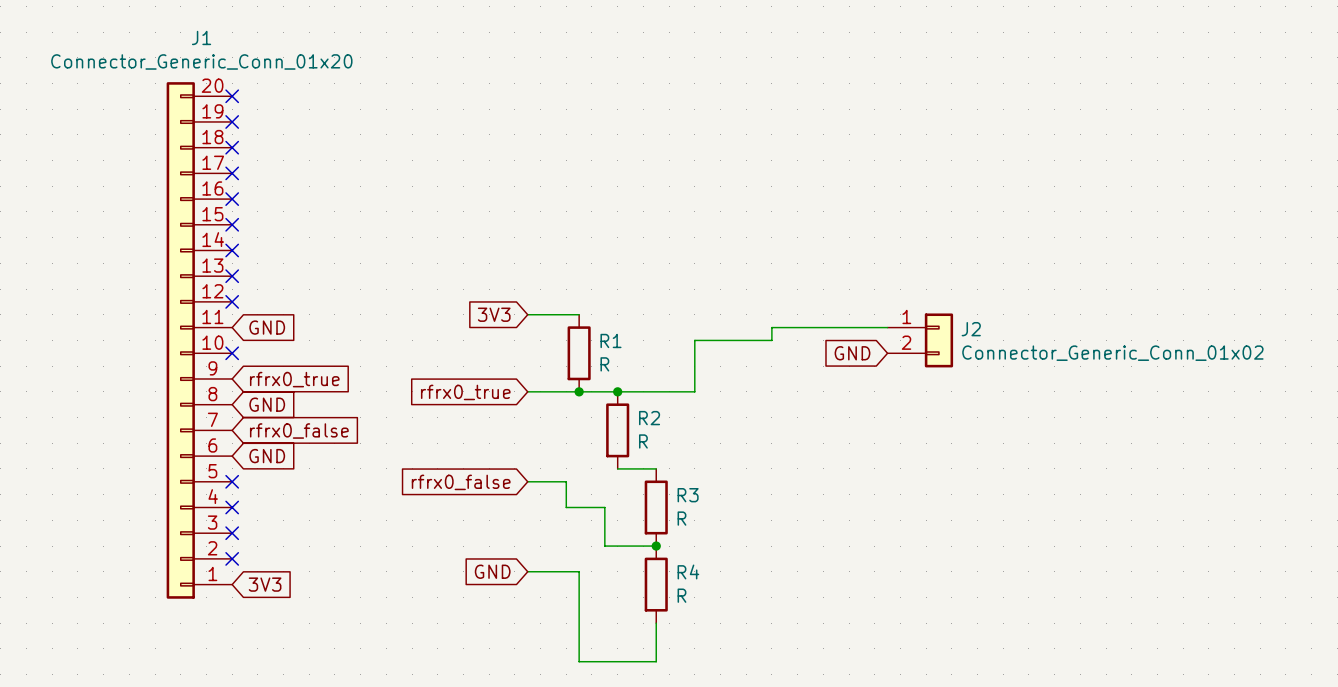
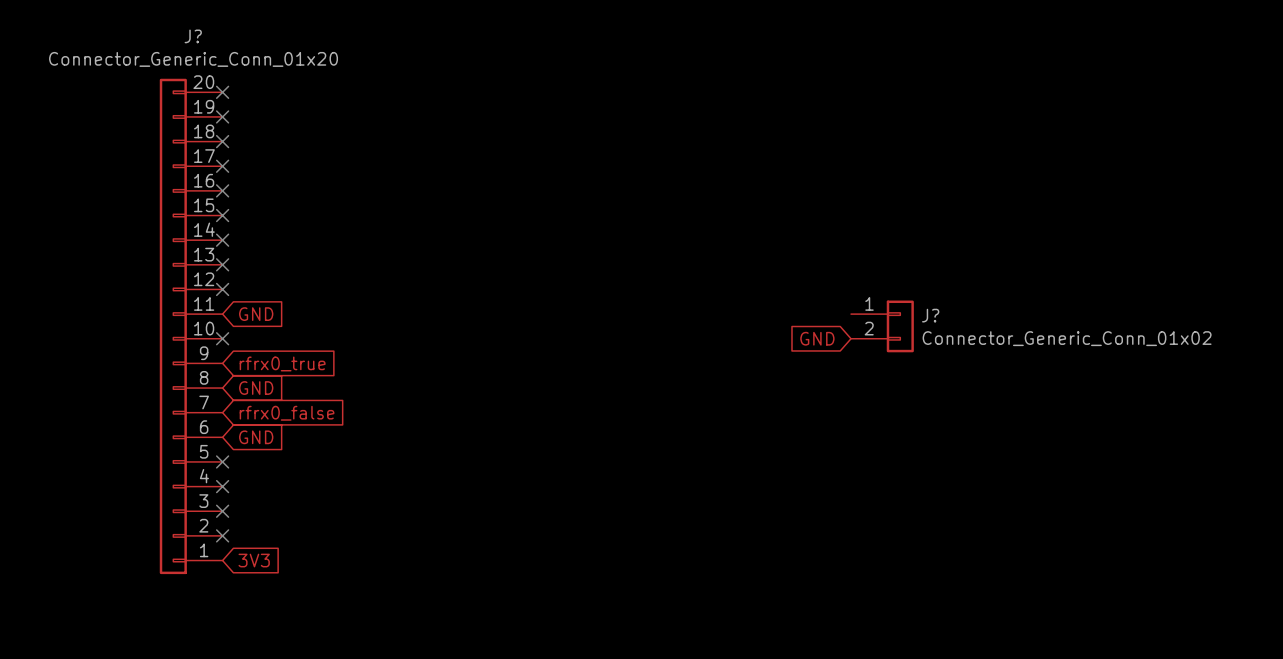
J1 name: J1 (201, 37) -> J? (193, 36)
global label: 3V3 (494, 314) -> none
wire: (527, 314) (579, 314) -> none
wire: (887, 327) (771, 327) (771, 340) (694, 340) (694, 391) (527, 391) -> none
J2 name: J2 (971, 329) -> J? (930, 315)
R1: R (579, 353) -> none
junction: (579, 391) -> none
junction: (617, 391) -> none
global label: rfrx0_true (465, 392) -> none
R2: R (617, 430) -> none
wire: (617, 468) (656, 468) -> none
wire: (527, 481) (566, 481) (566, 507) (604, 507) (604, 546) (656, 546) -> none
global label: rfrx0_false (461, 482) -> none
R3: R (656, 507) -> none
junction: (656, 546) -> none
global label: GND (492, 571) -> none
wire: (527, 571) (579, 571) (579, 661) (656, 661) (656, 623) -> none
R4: R (656, 584) -> none

